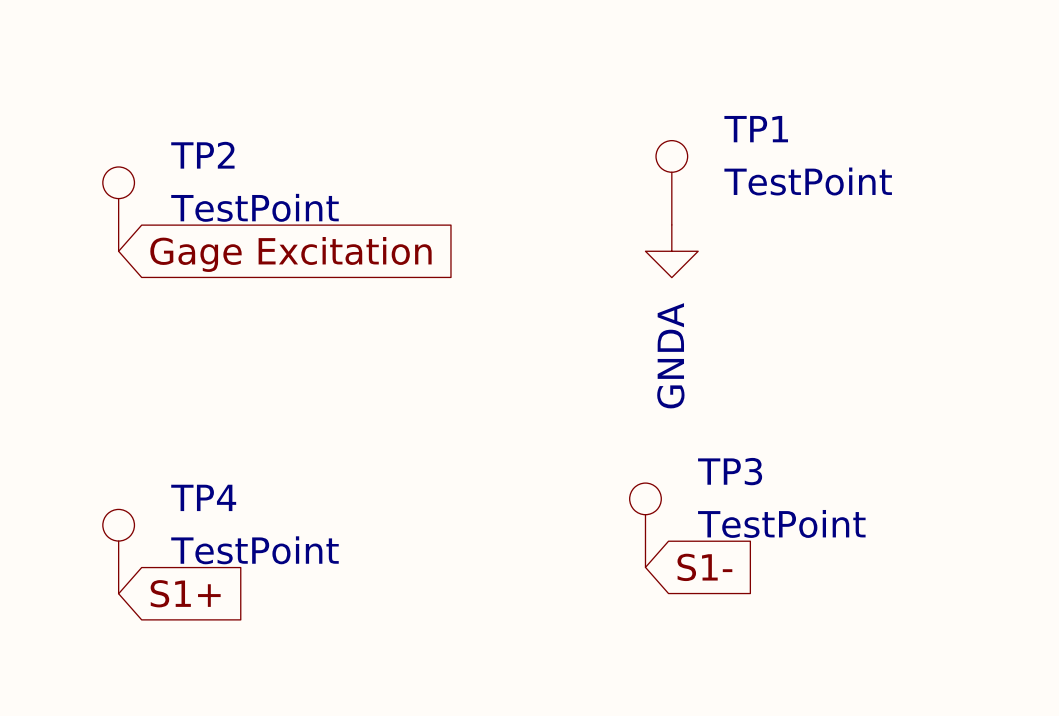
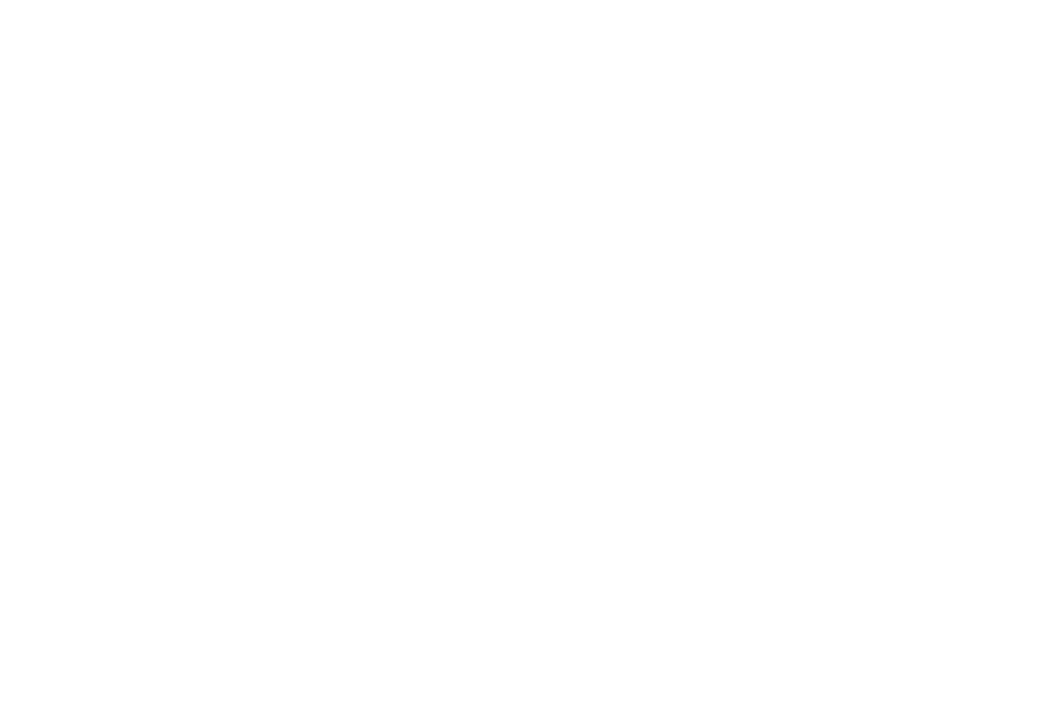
TP1: TestPoint (671, 182) -> none
TP2: TestPoint (118, 209) -> none
power symbol: GNDA (671, 251) -> none
global label: Gage Excitation (290, 254) -> none
TP3: TestPoint (645, 525) -> none
TP4: TestPoint (118, 551) -> none
global label: S1- (704, 567) -> none
global label: S1+ (185, 593) -> none

